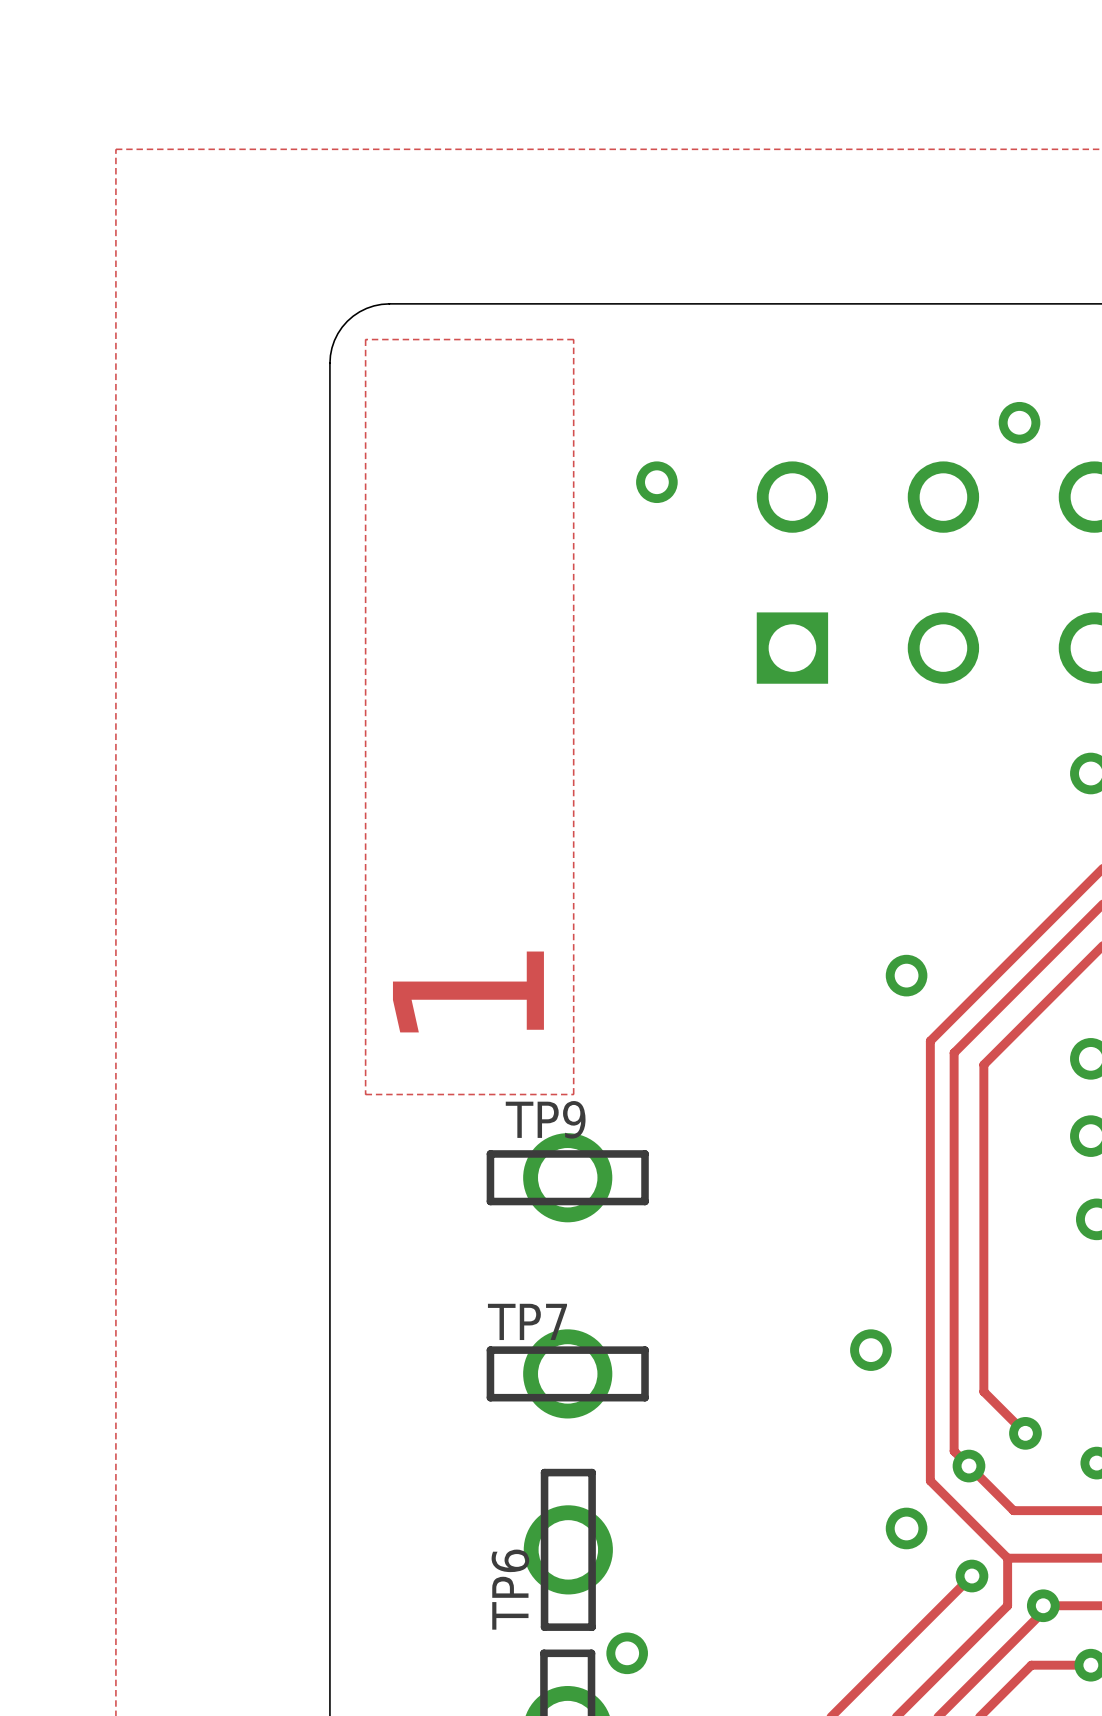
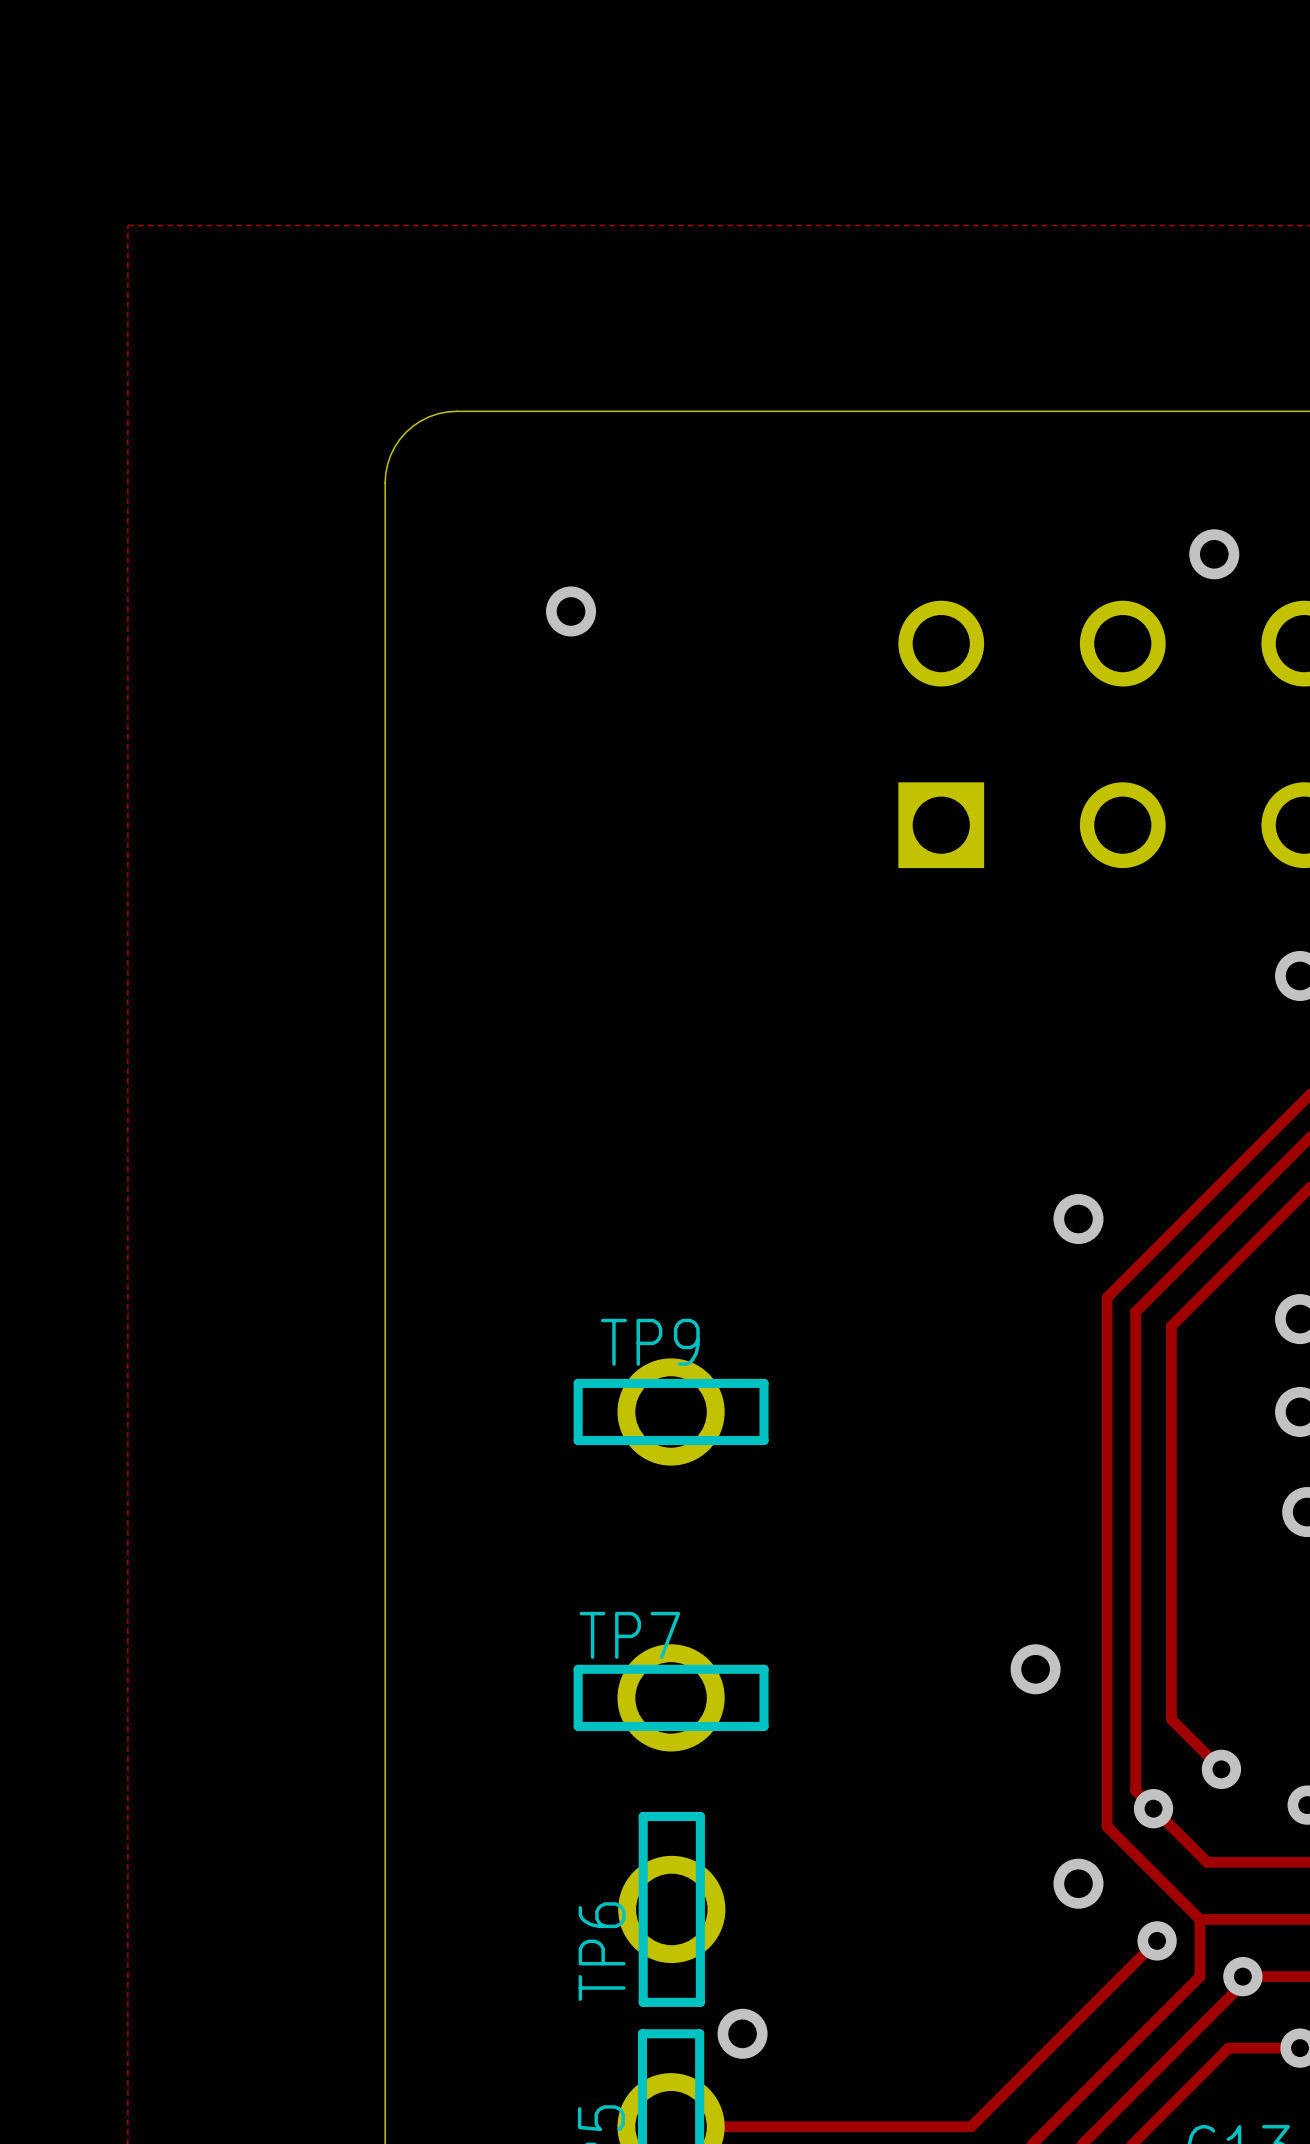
zone outline: (365, 339) (573, 339) (573, 1094) (365, 1094) (365, 339) -> none
via position: (656, 482) -> (571, 611)
text: 1 (468, 991) -> none
TP9 position: (567, 1177) -> (671, 1411)

